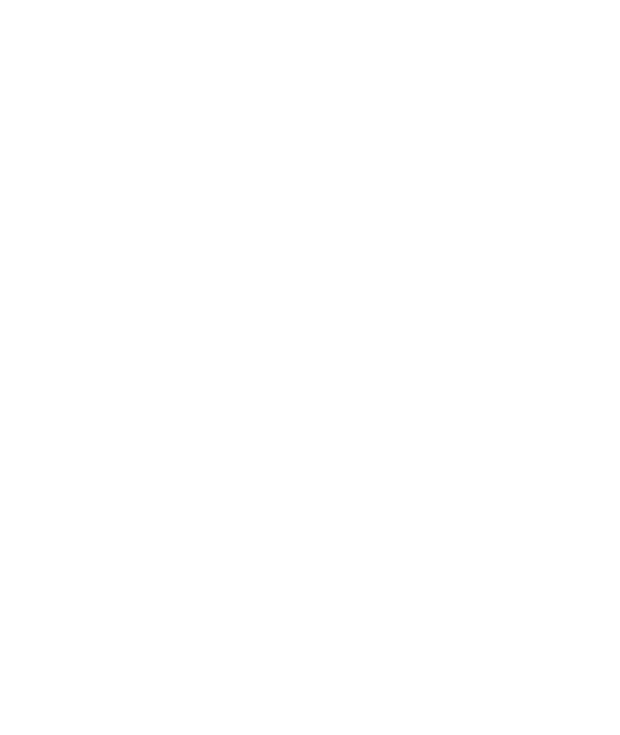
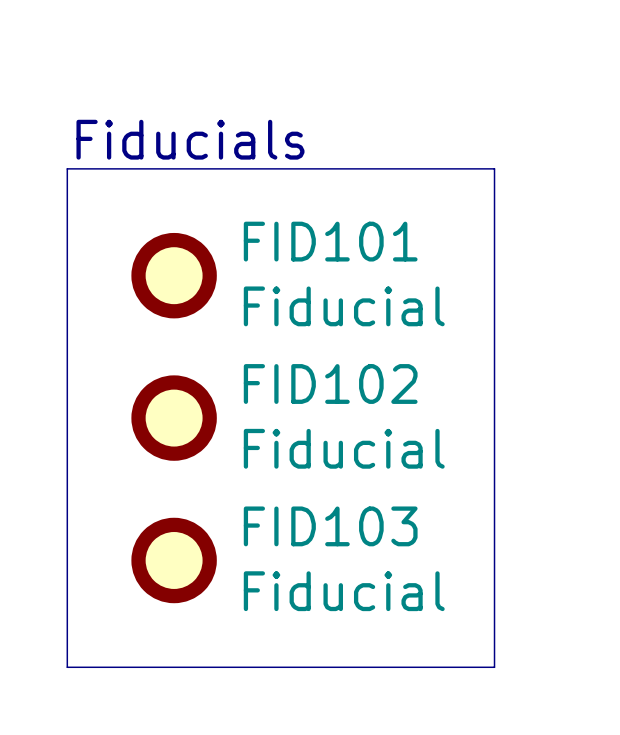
text: none -> Fiducials (190, 139)
line: none -> (67, 168) (67, 667) (494, 667) (494, 168) (67, 168)
FID101: none -> Fiducial (174, 275)
FID102: none -> Fiducial (174, 418)
FID103: none -> Fiducial (174, 560)

